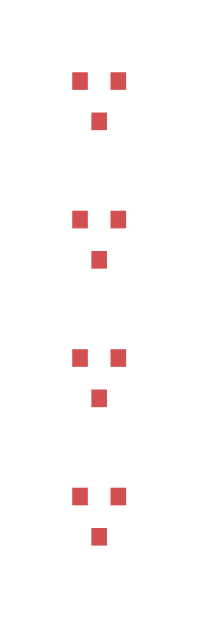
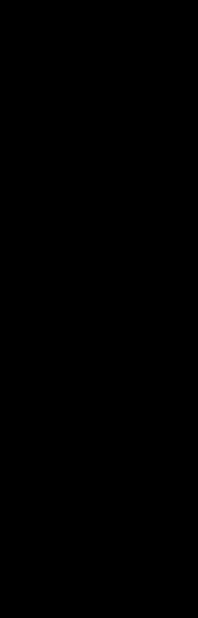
part: (99, 101) -> none
part: (99, 239) -> none
part: (99, 378) -> none
part: (99, 516) -> none

